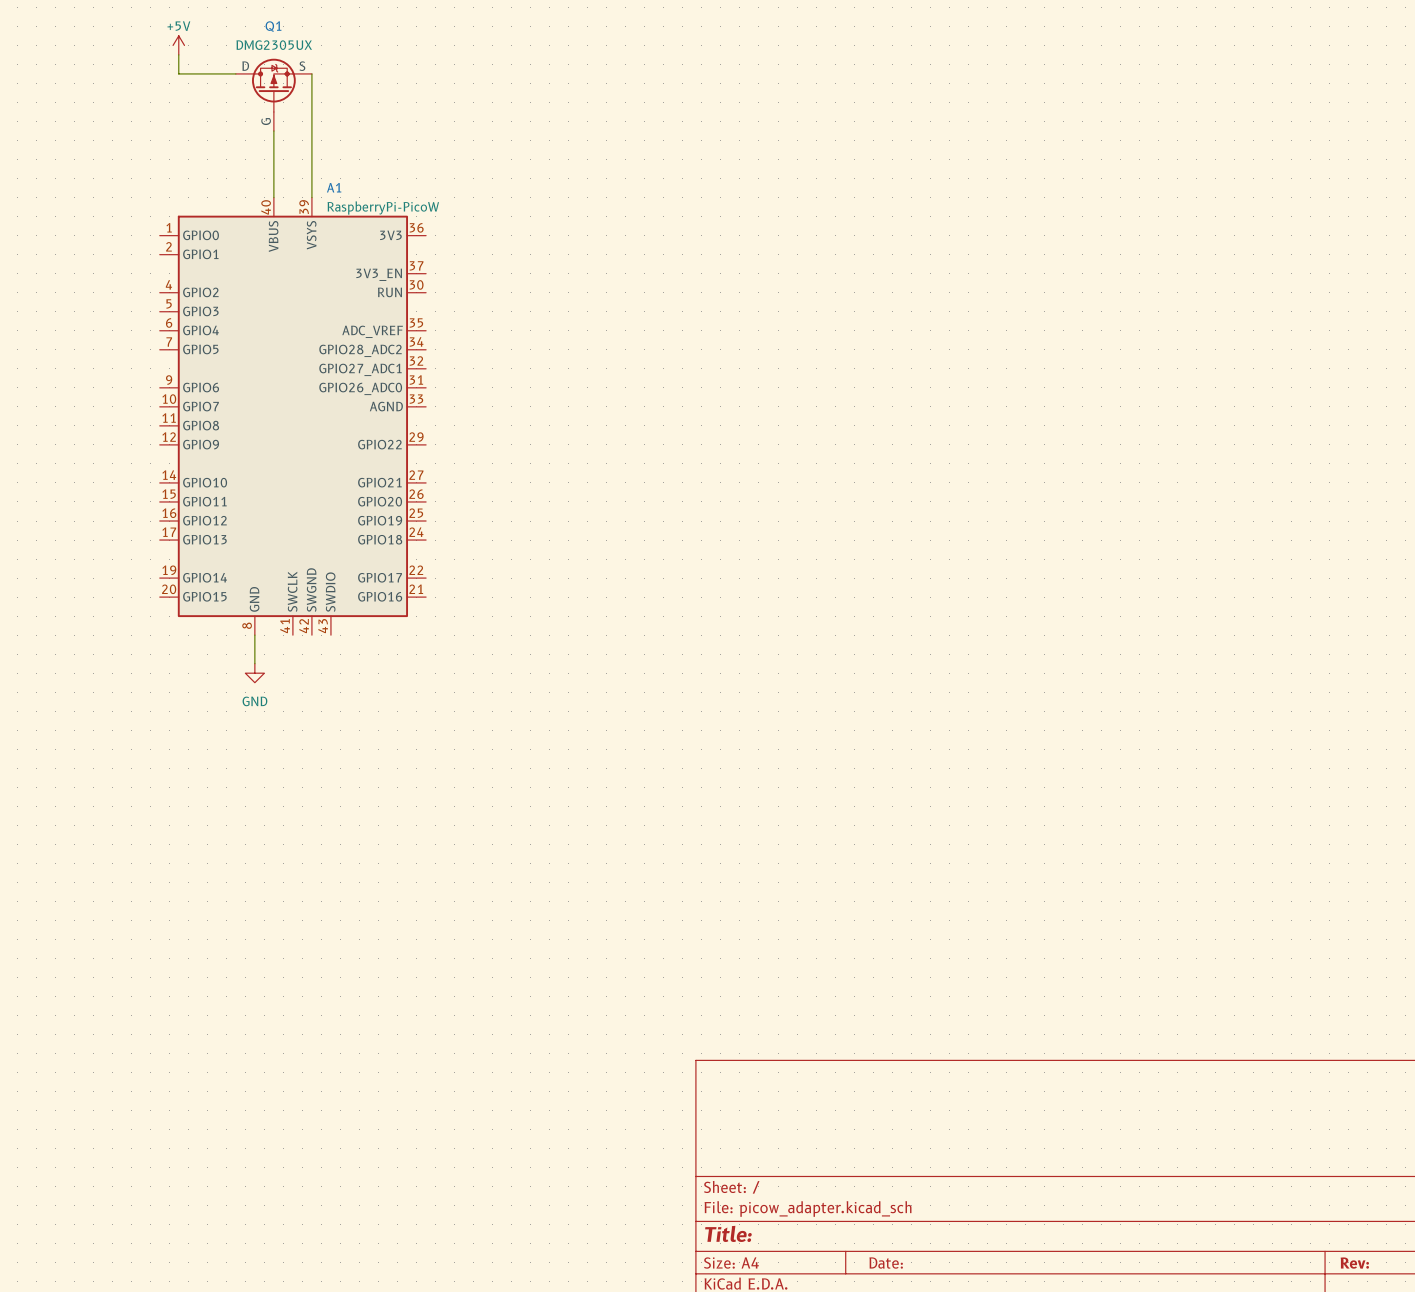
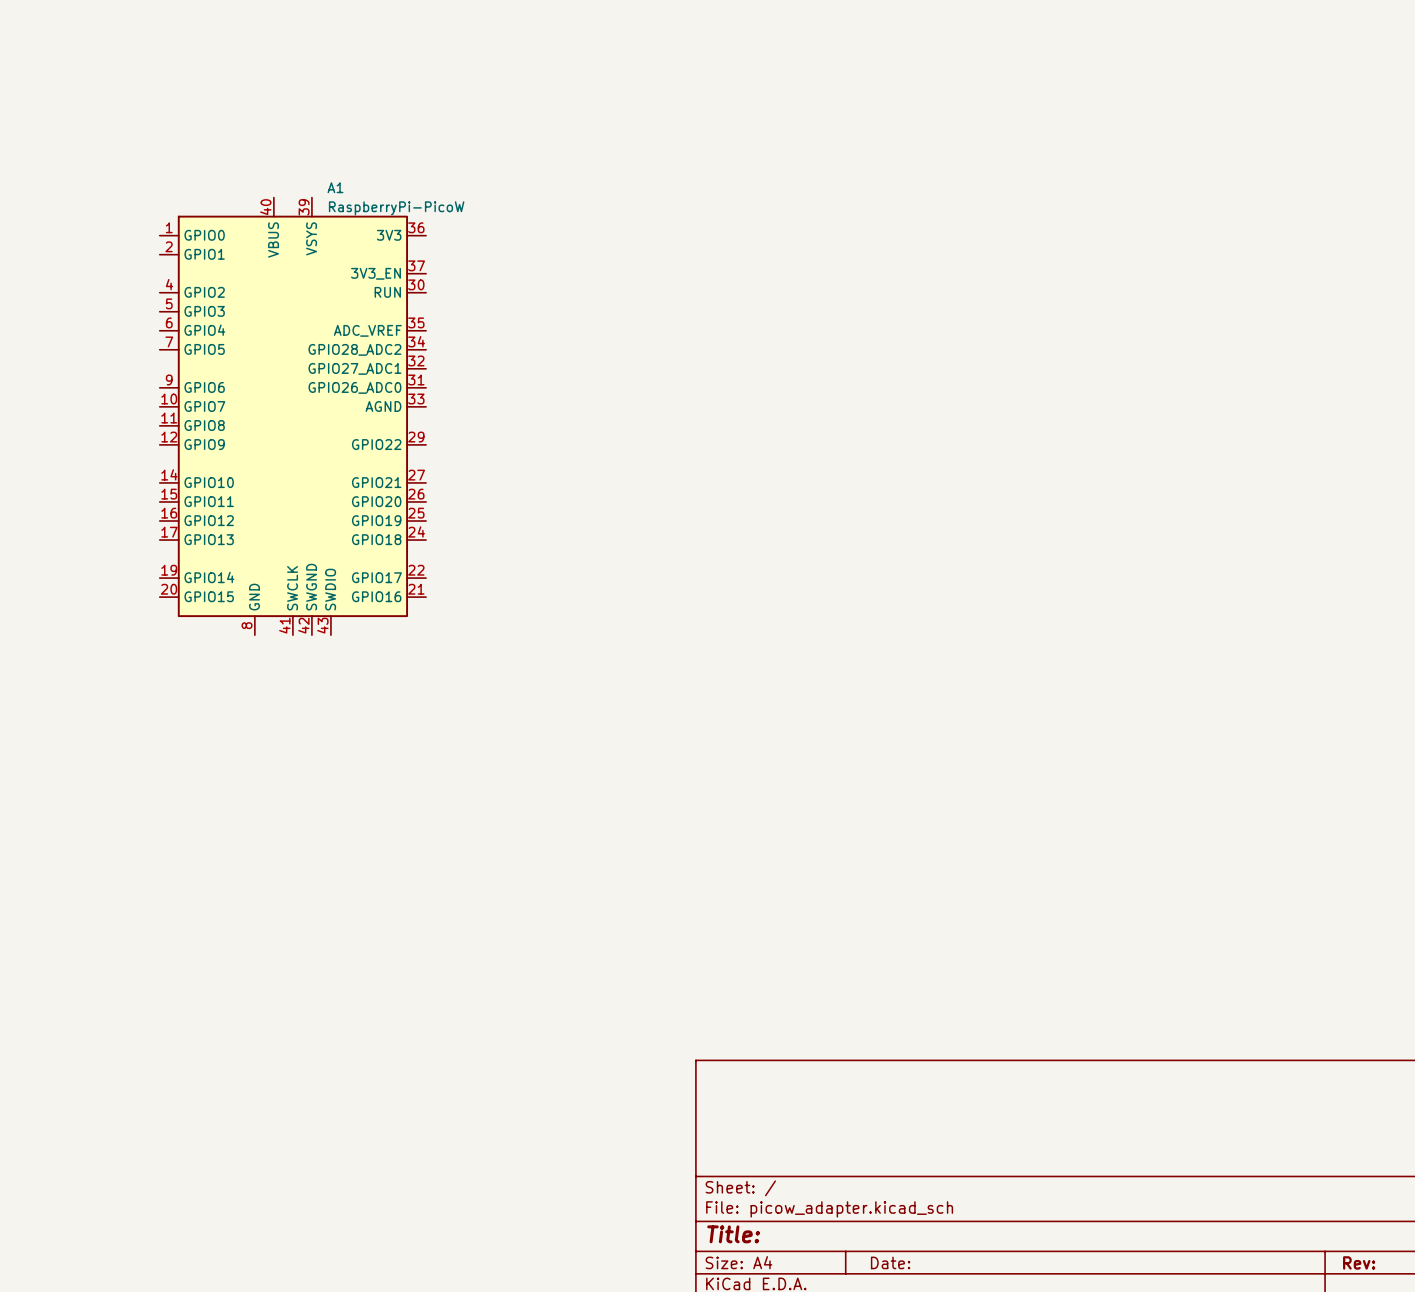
power symbol: +5V (178, 45) -> none
wire: (178, 54) (178, 73) (235, 73) -> none
wire: (311, 73) (311, 197) -> none
Q1: DMG2305UX (273, 94) -> none
wire: (273, 131) (273, 197) -> none
wire: (254, 635) (254, 663) -> none
power symbol: GND (254, 673) -> none

